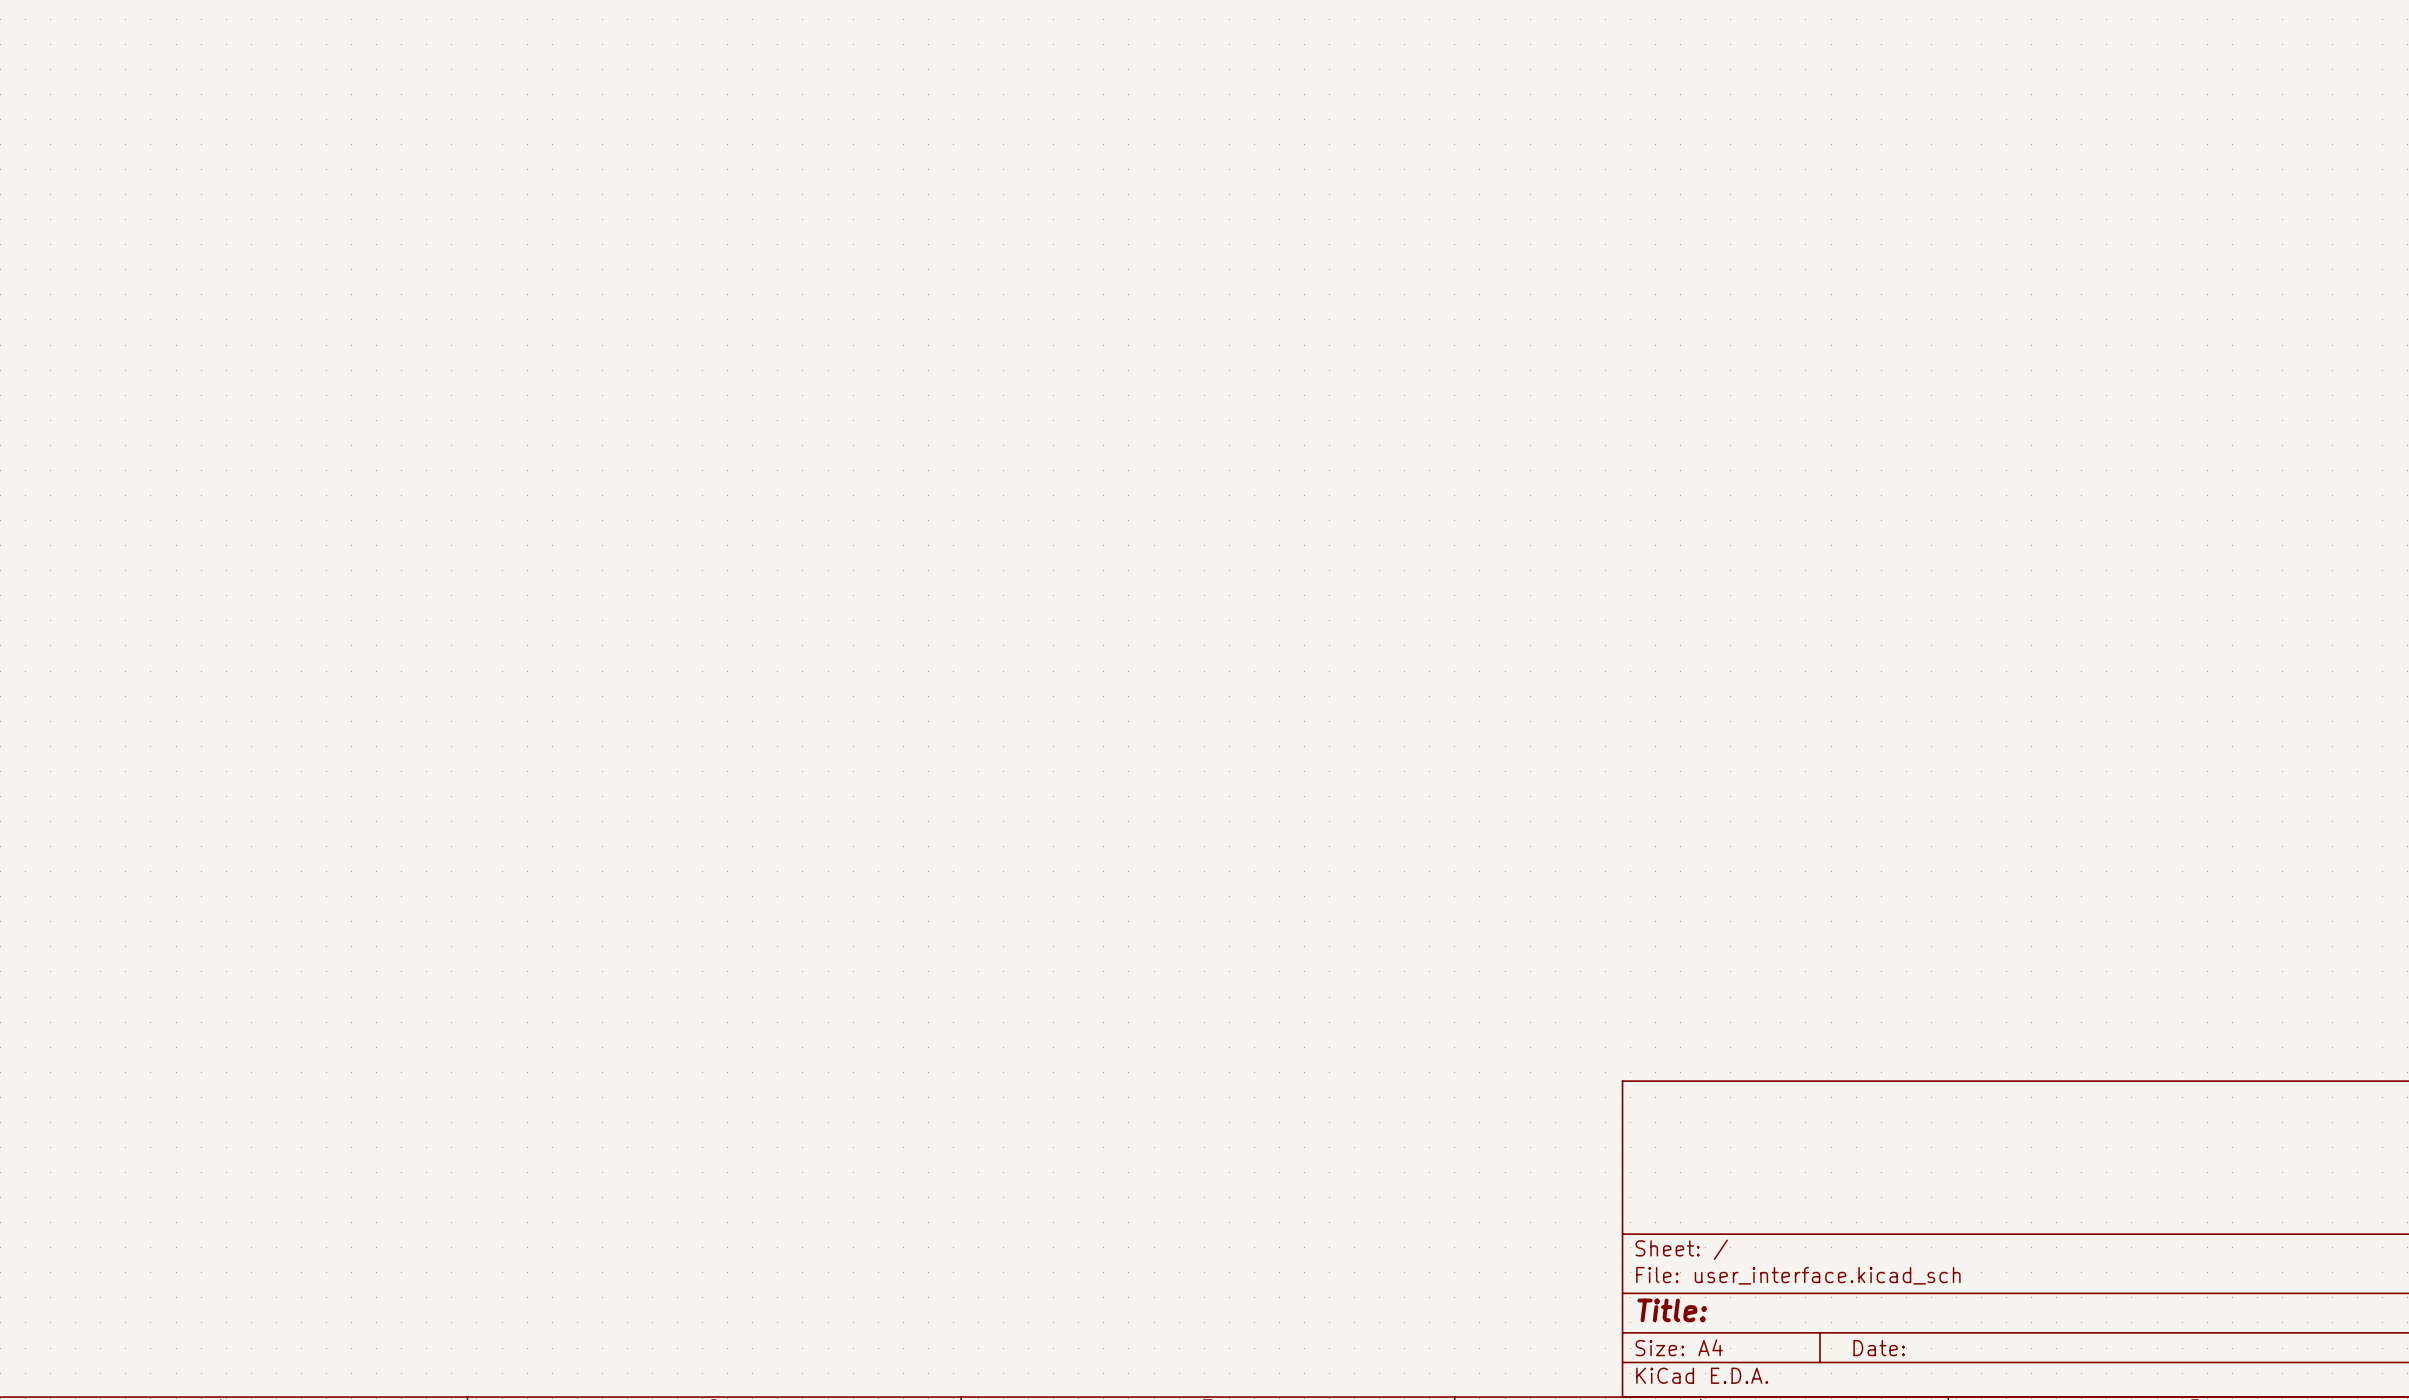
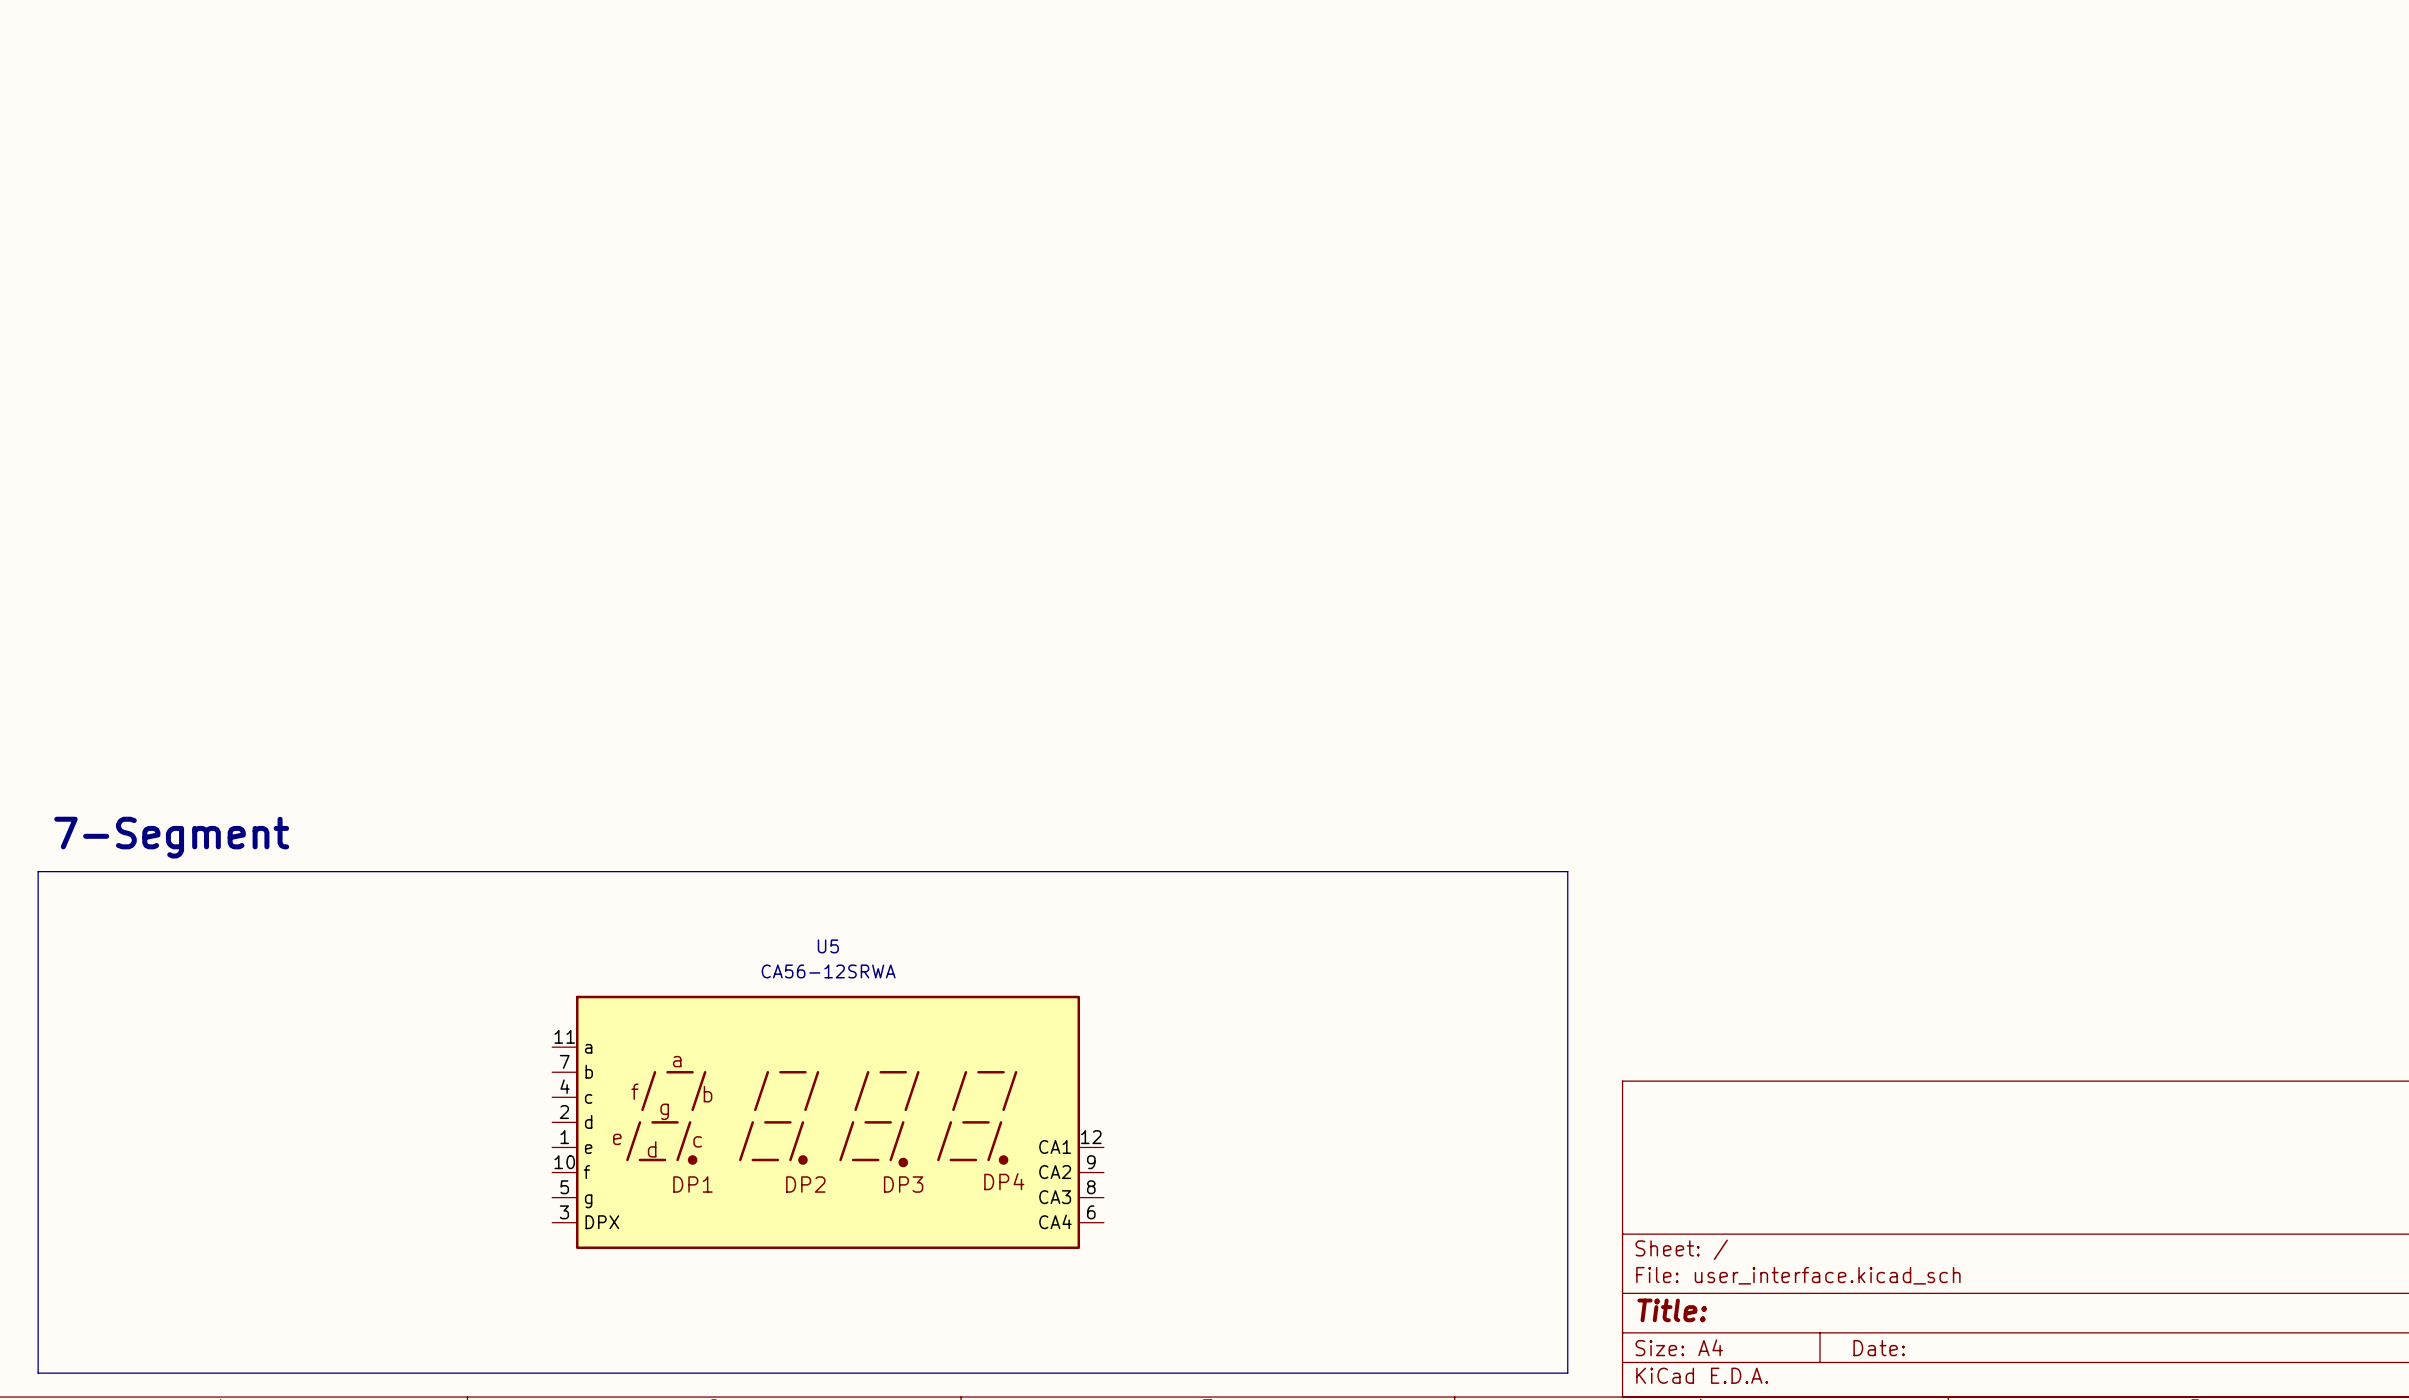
text: none -> 7-Segment (171, 837)
line: none -> (38, 871) (1567, 871) (1567, 1373) (38, 1373) (38, 871)
U5: none -> CA56-12SRWA (828, 1122)

